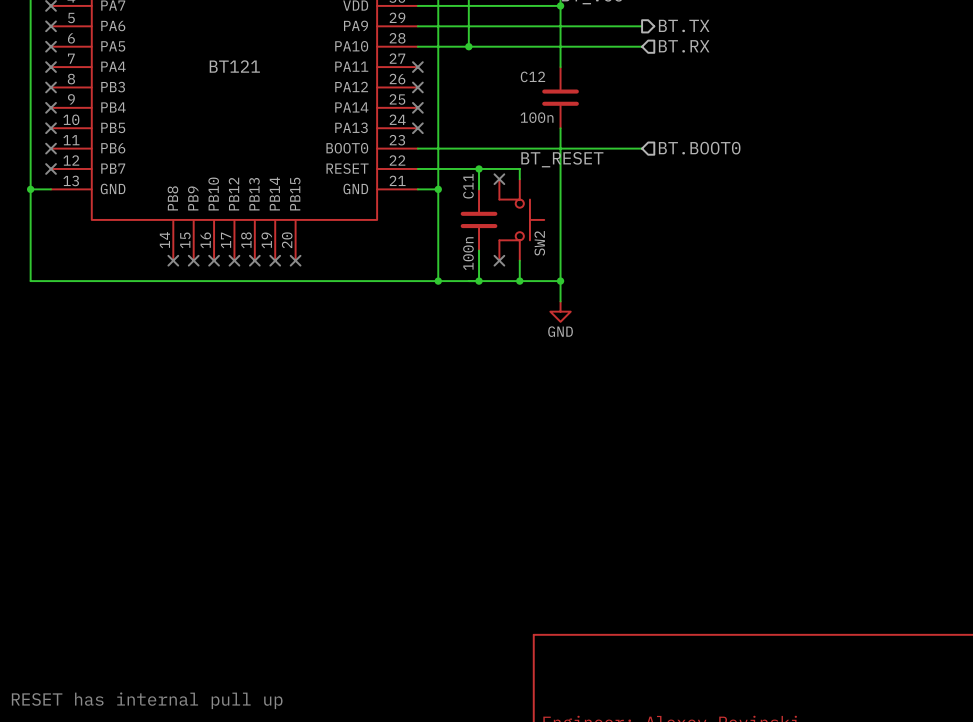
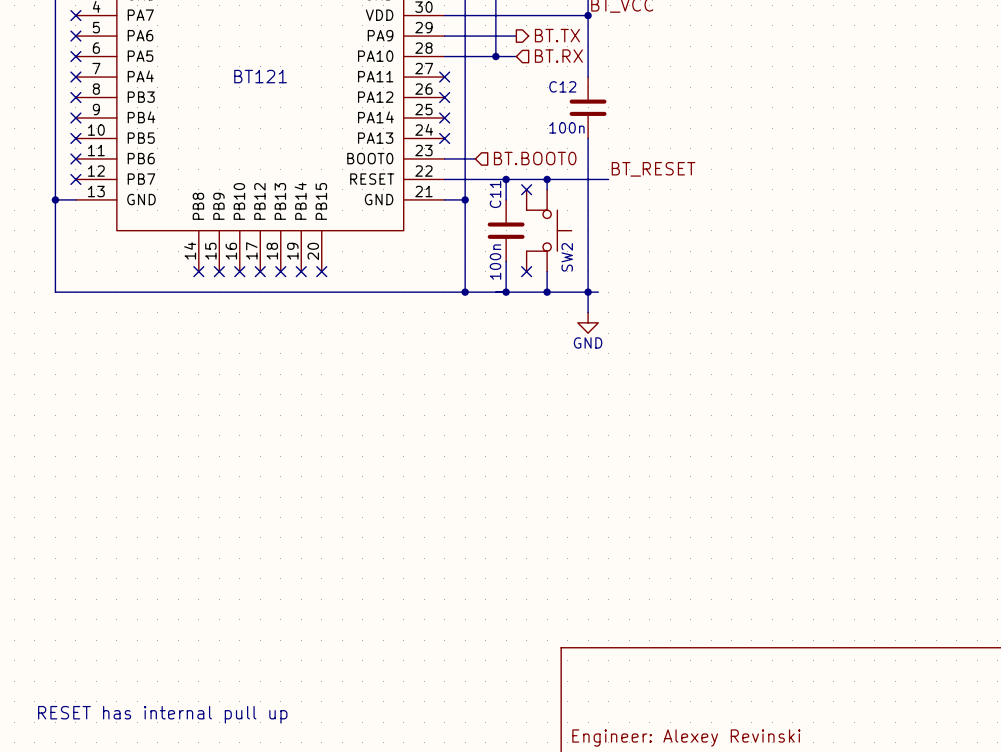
hierarchical label position: BT.TX (684, 25) -> BT.TX (557, 35)
wire: (489, 26) (642, 26) -> none
wire: (489, 46) (642, 46) -> none
hierarchical label position: BT.RX (684, 46) -> BT.RX (558, 56)
wire: (448, 148) (642, 148) -> none
hierarchical label position: BT.BOOT0 (699, 148) -> BT.BOOT0 (535, 158)
label position: BT_RESET (562, 159) -> BT_RESET (653, 169)
wire: none -> (547, 179) (608, 179)
junction: none -> (547, 179)
wire: none -> (588, 292) (598, 292)

